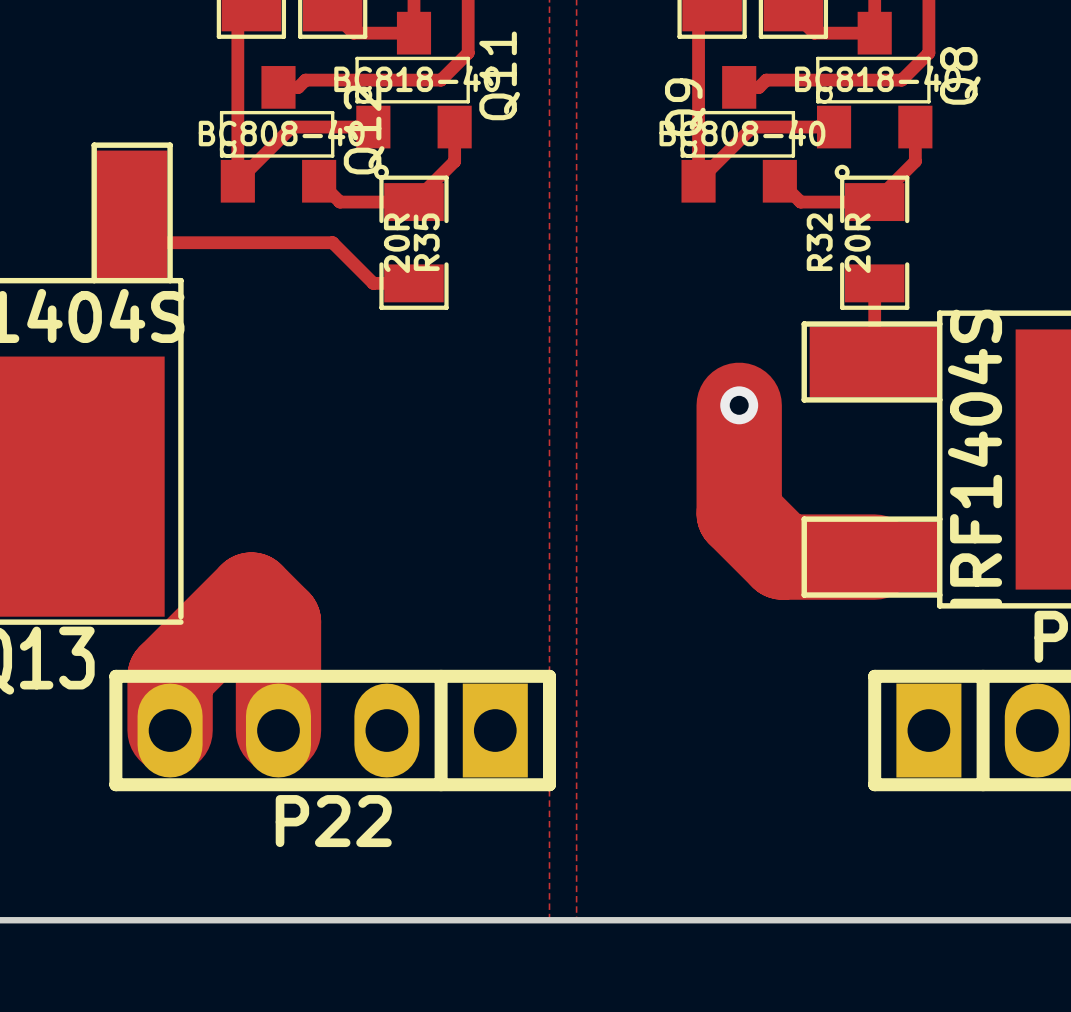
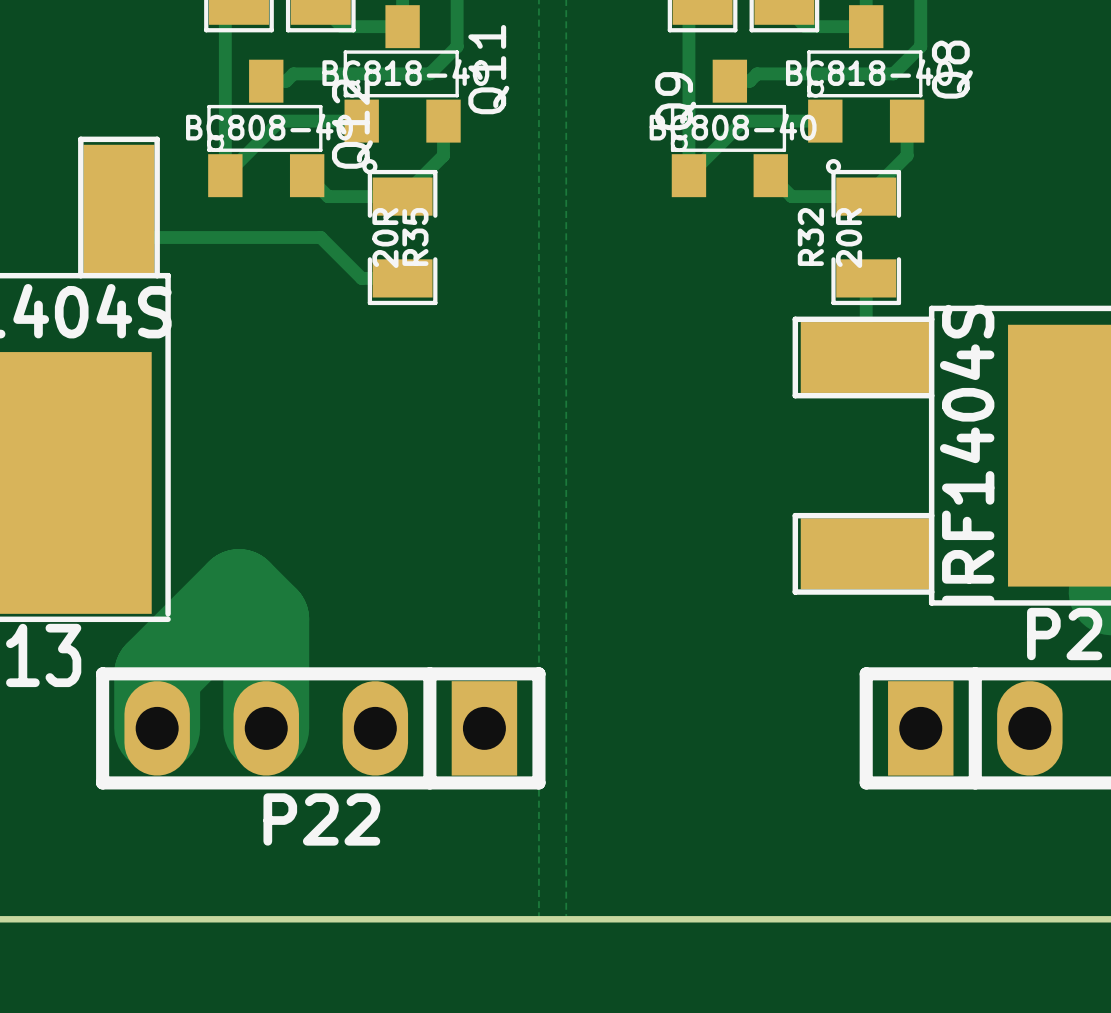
track: (739, 405) (739, 513) (782, 557) (874, 557) -> none
via: (739, 405) -> none

